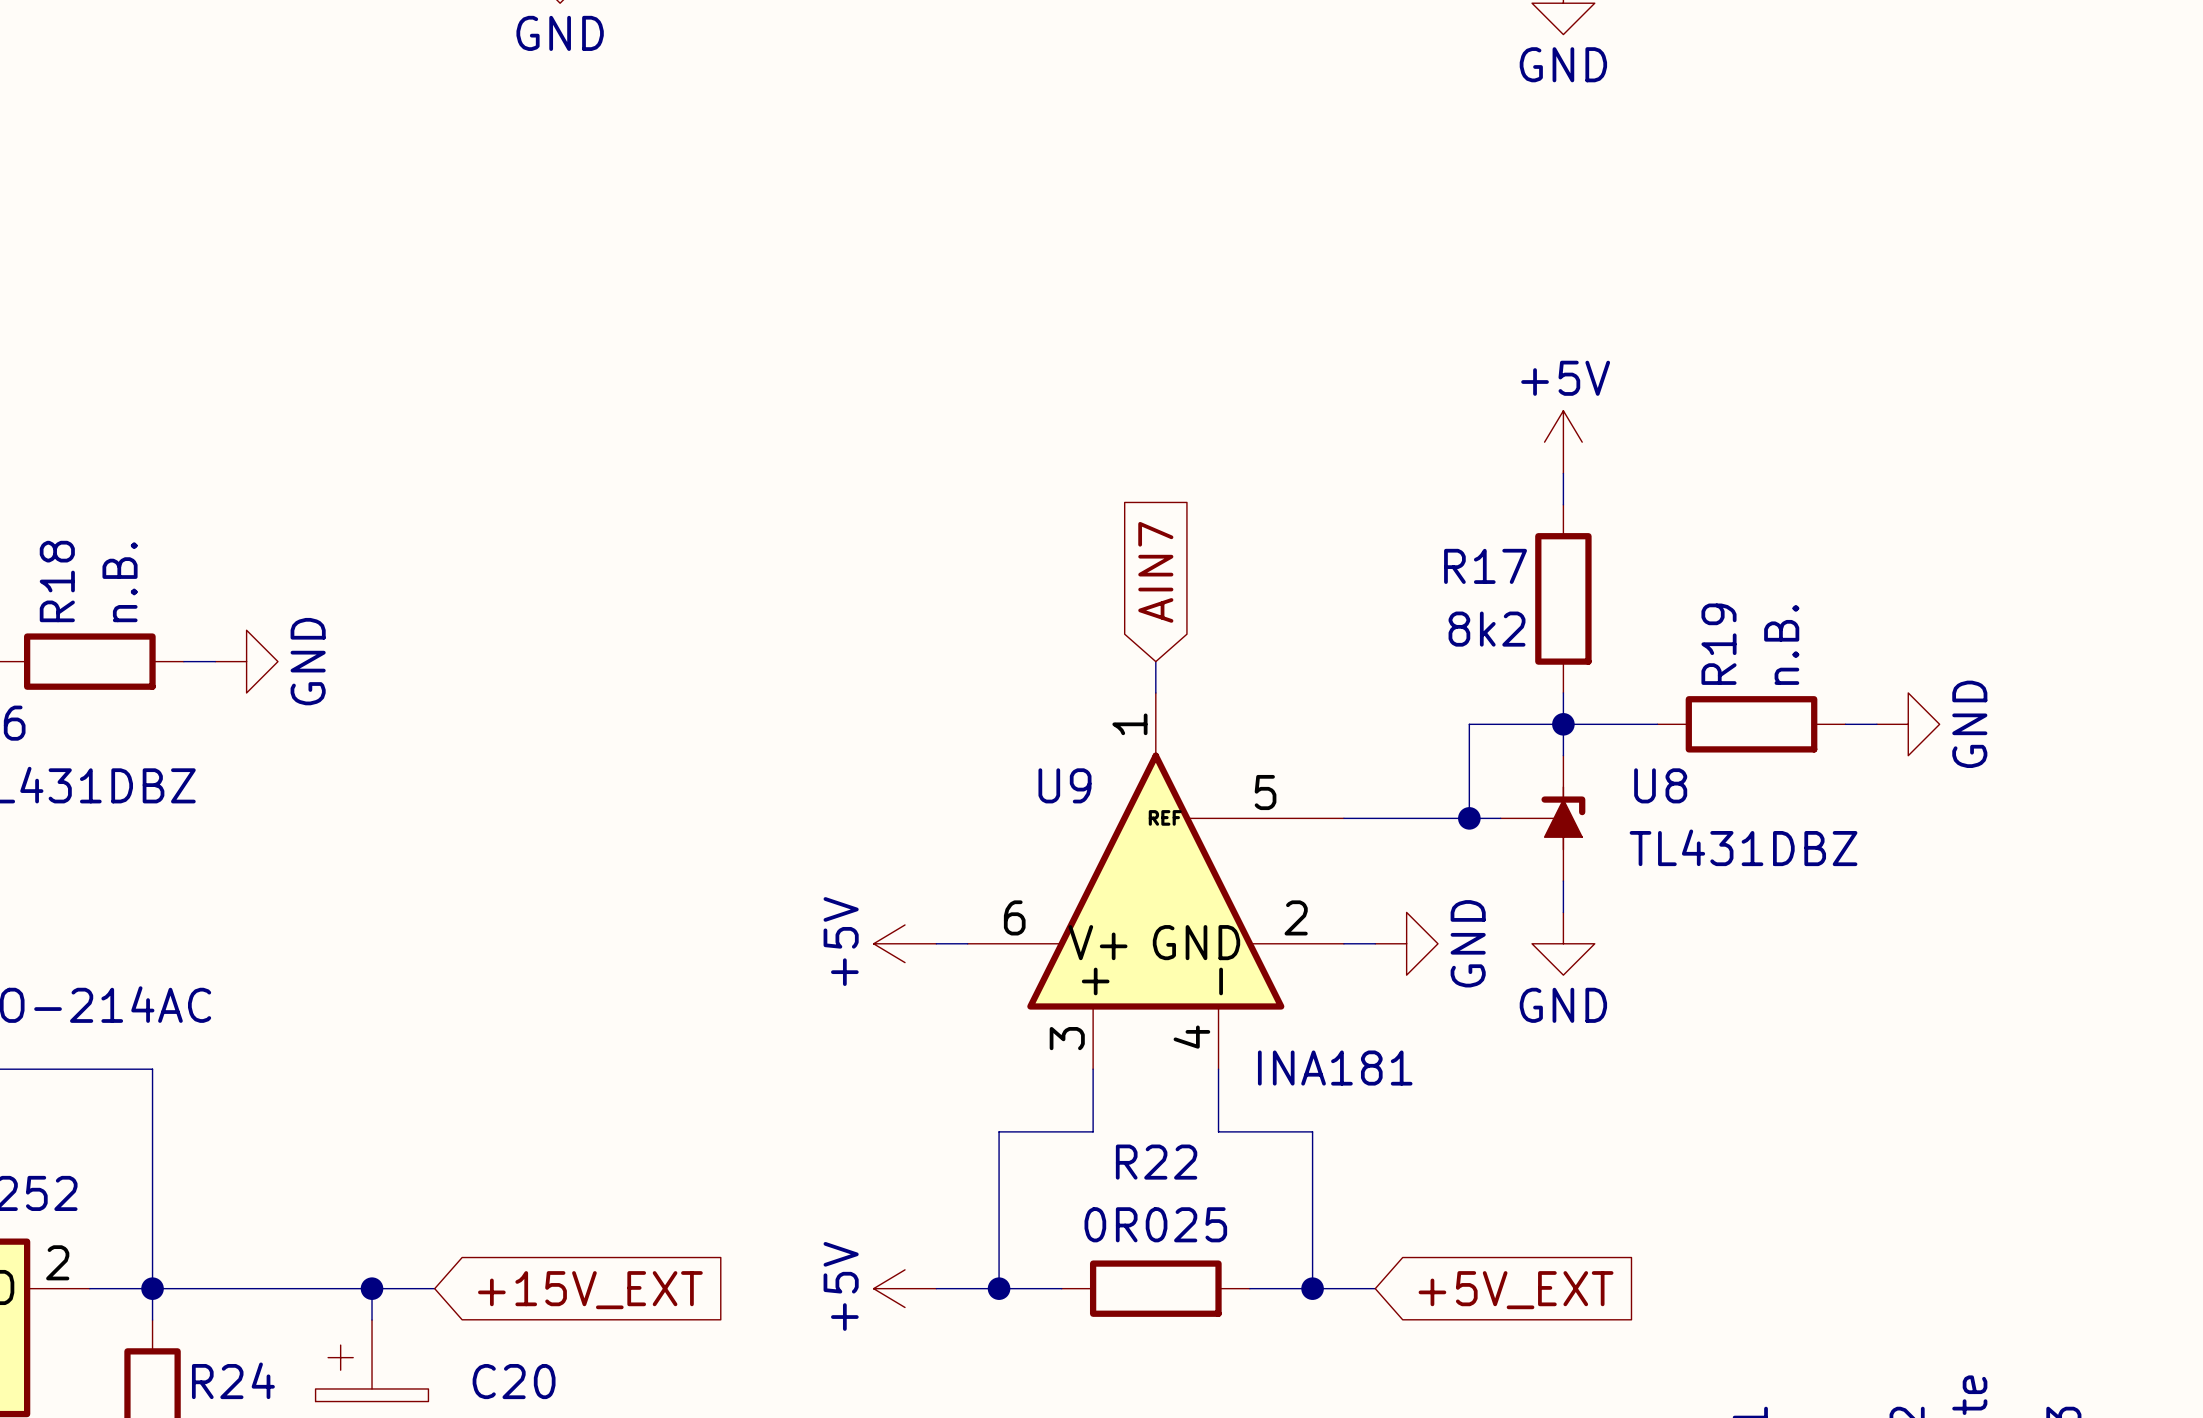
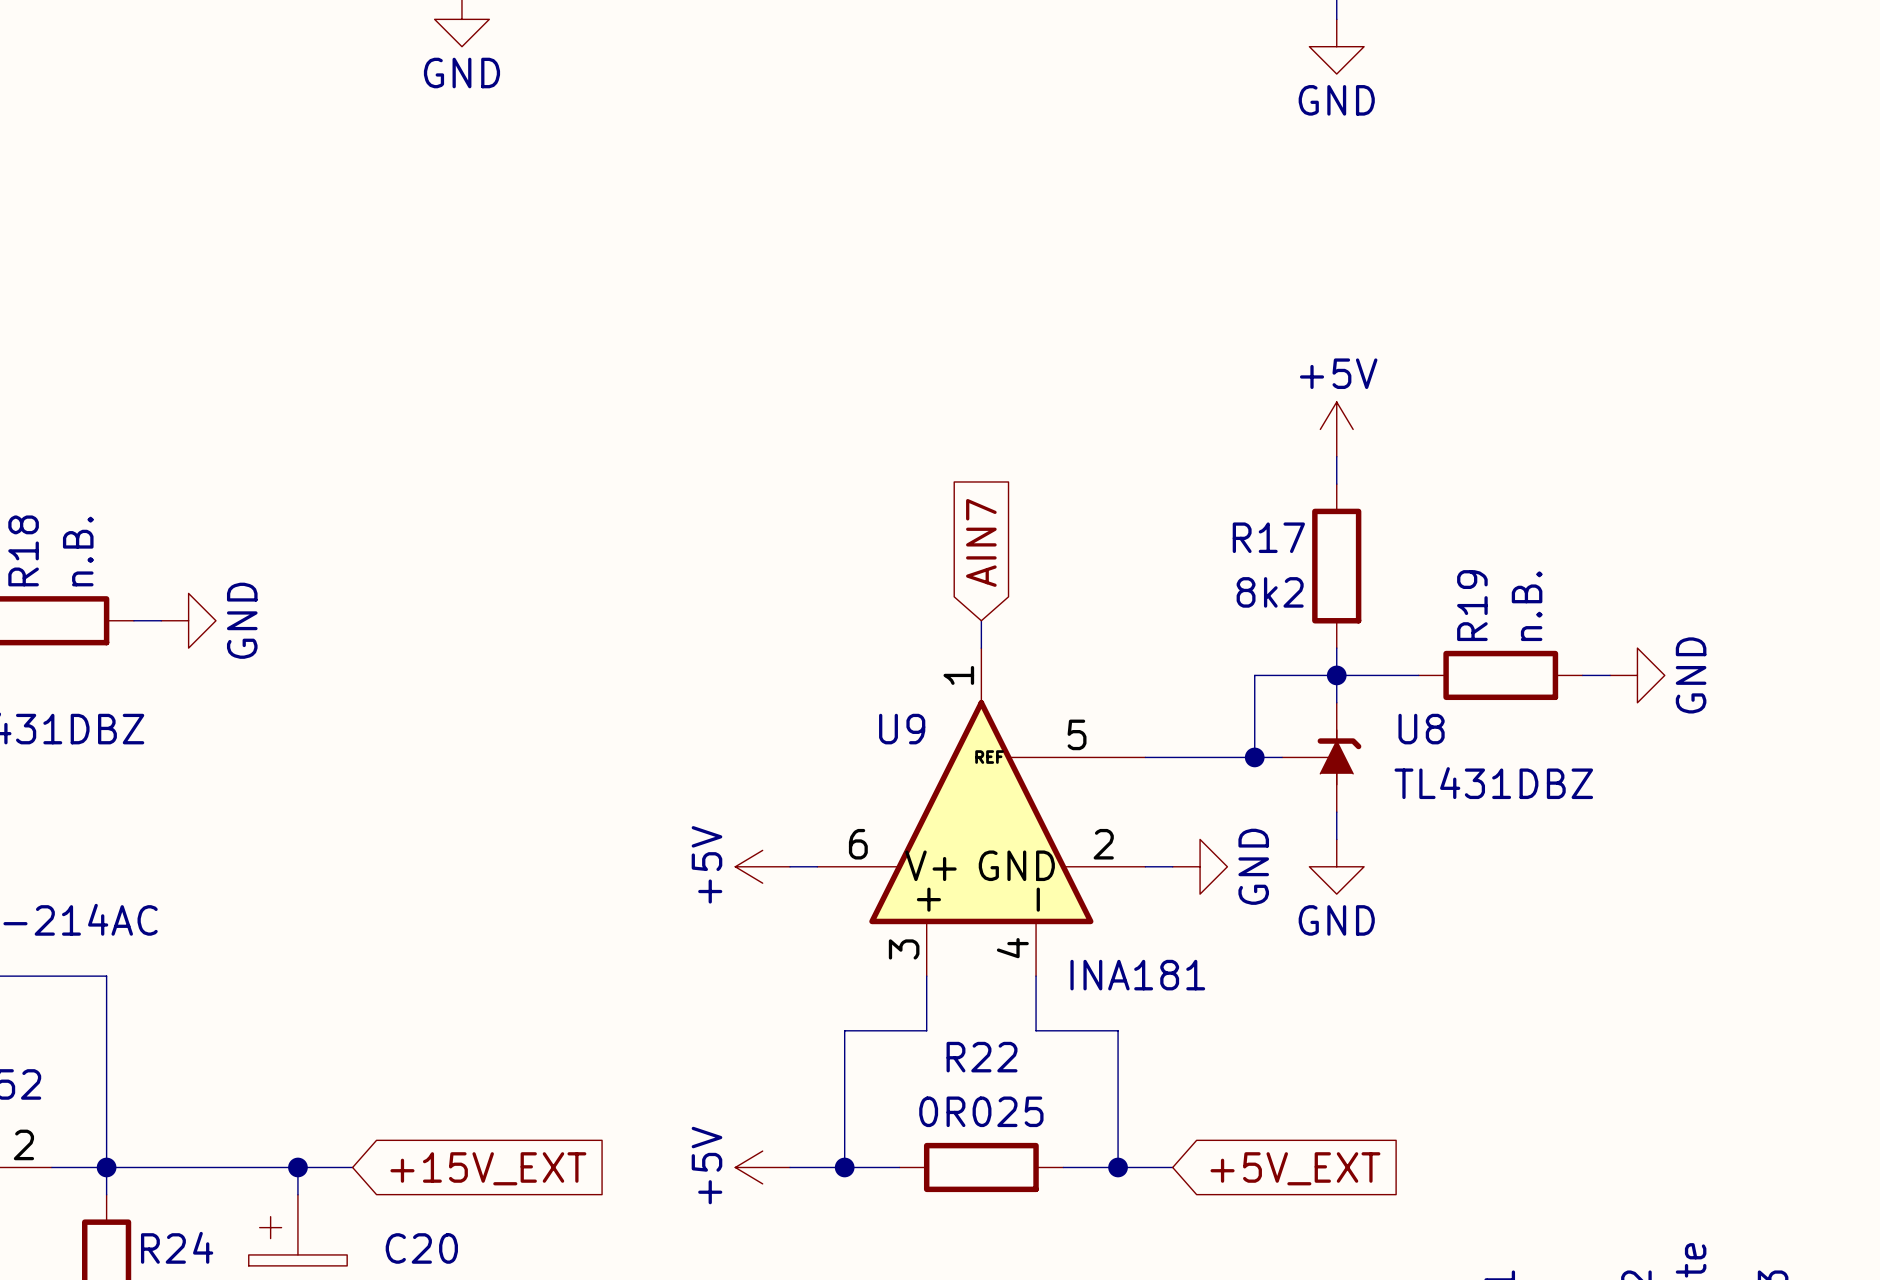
U8 symbol: [1500, 755, 1586, 882] -> [1282, 702, 1362, 813]

